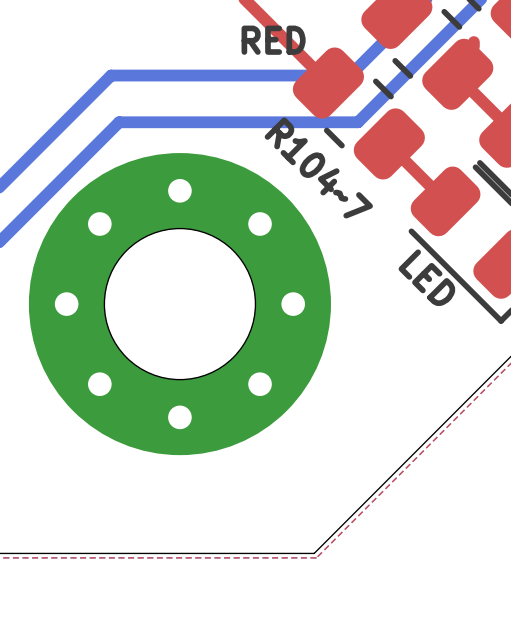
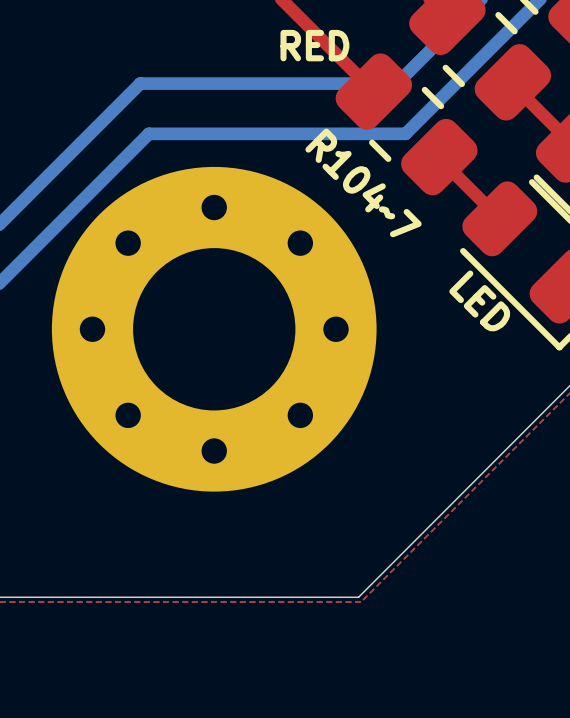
top track: (473, 42) (473, 46) -> none
round board edge: [104, 228, 256, 380] -> none

